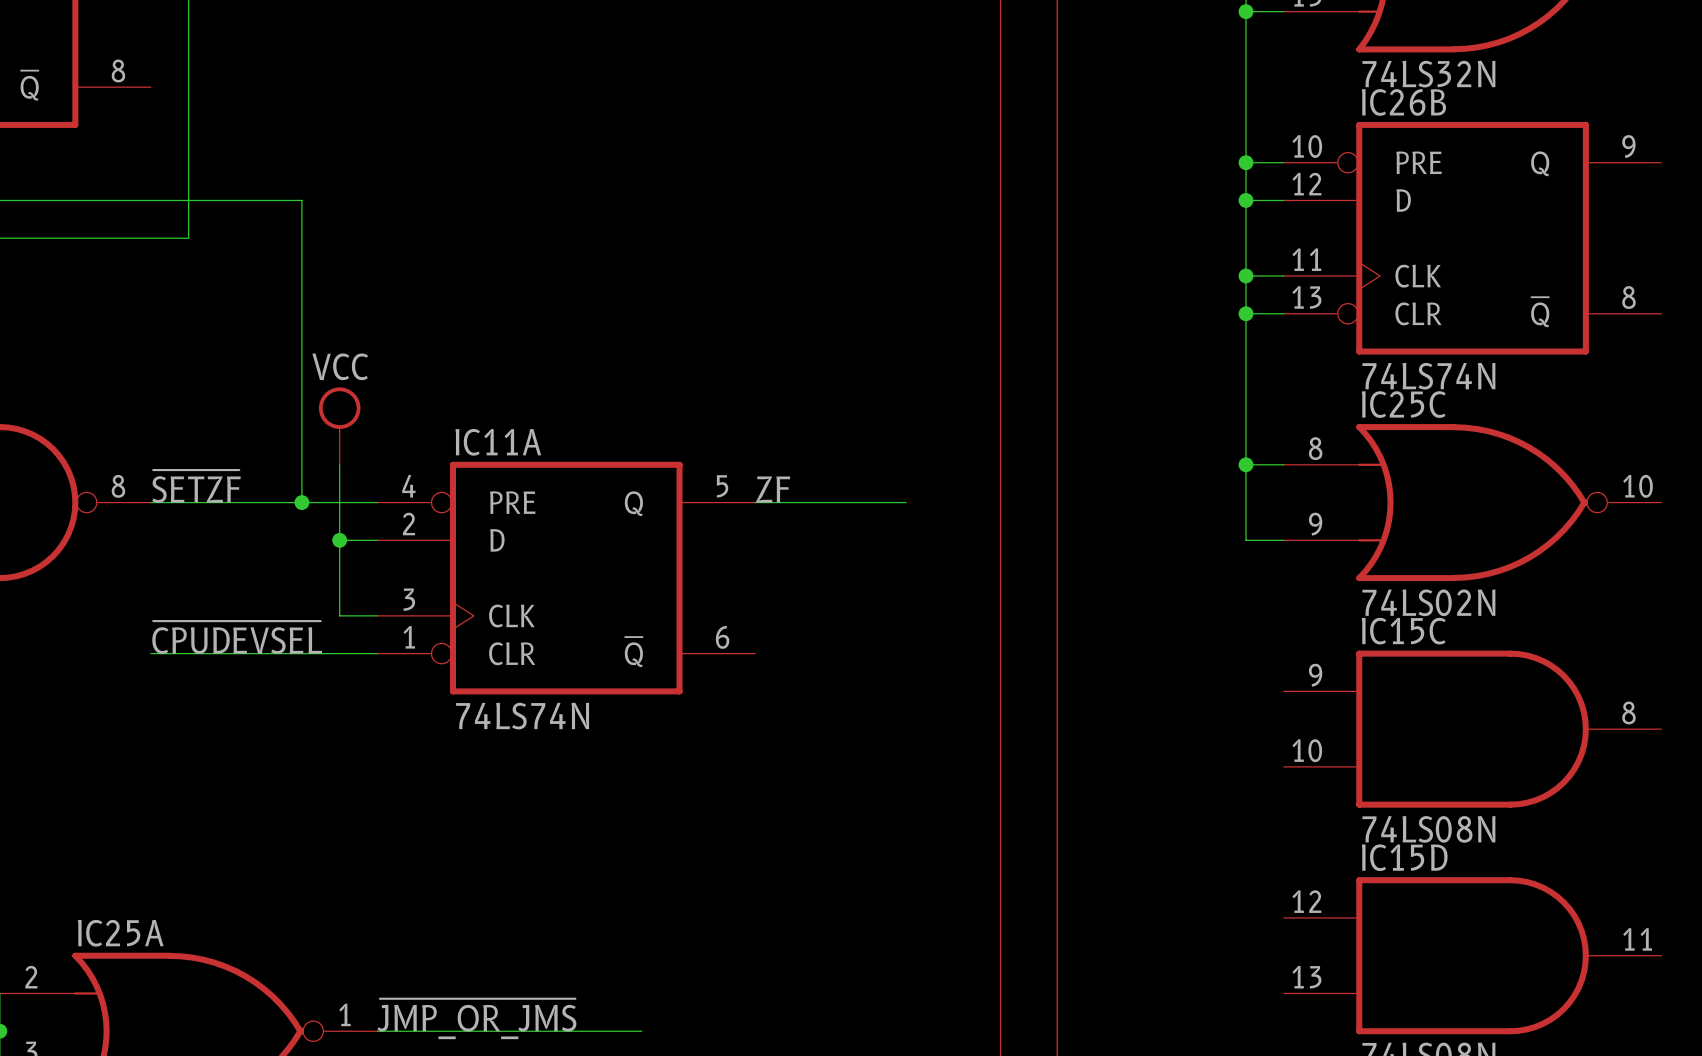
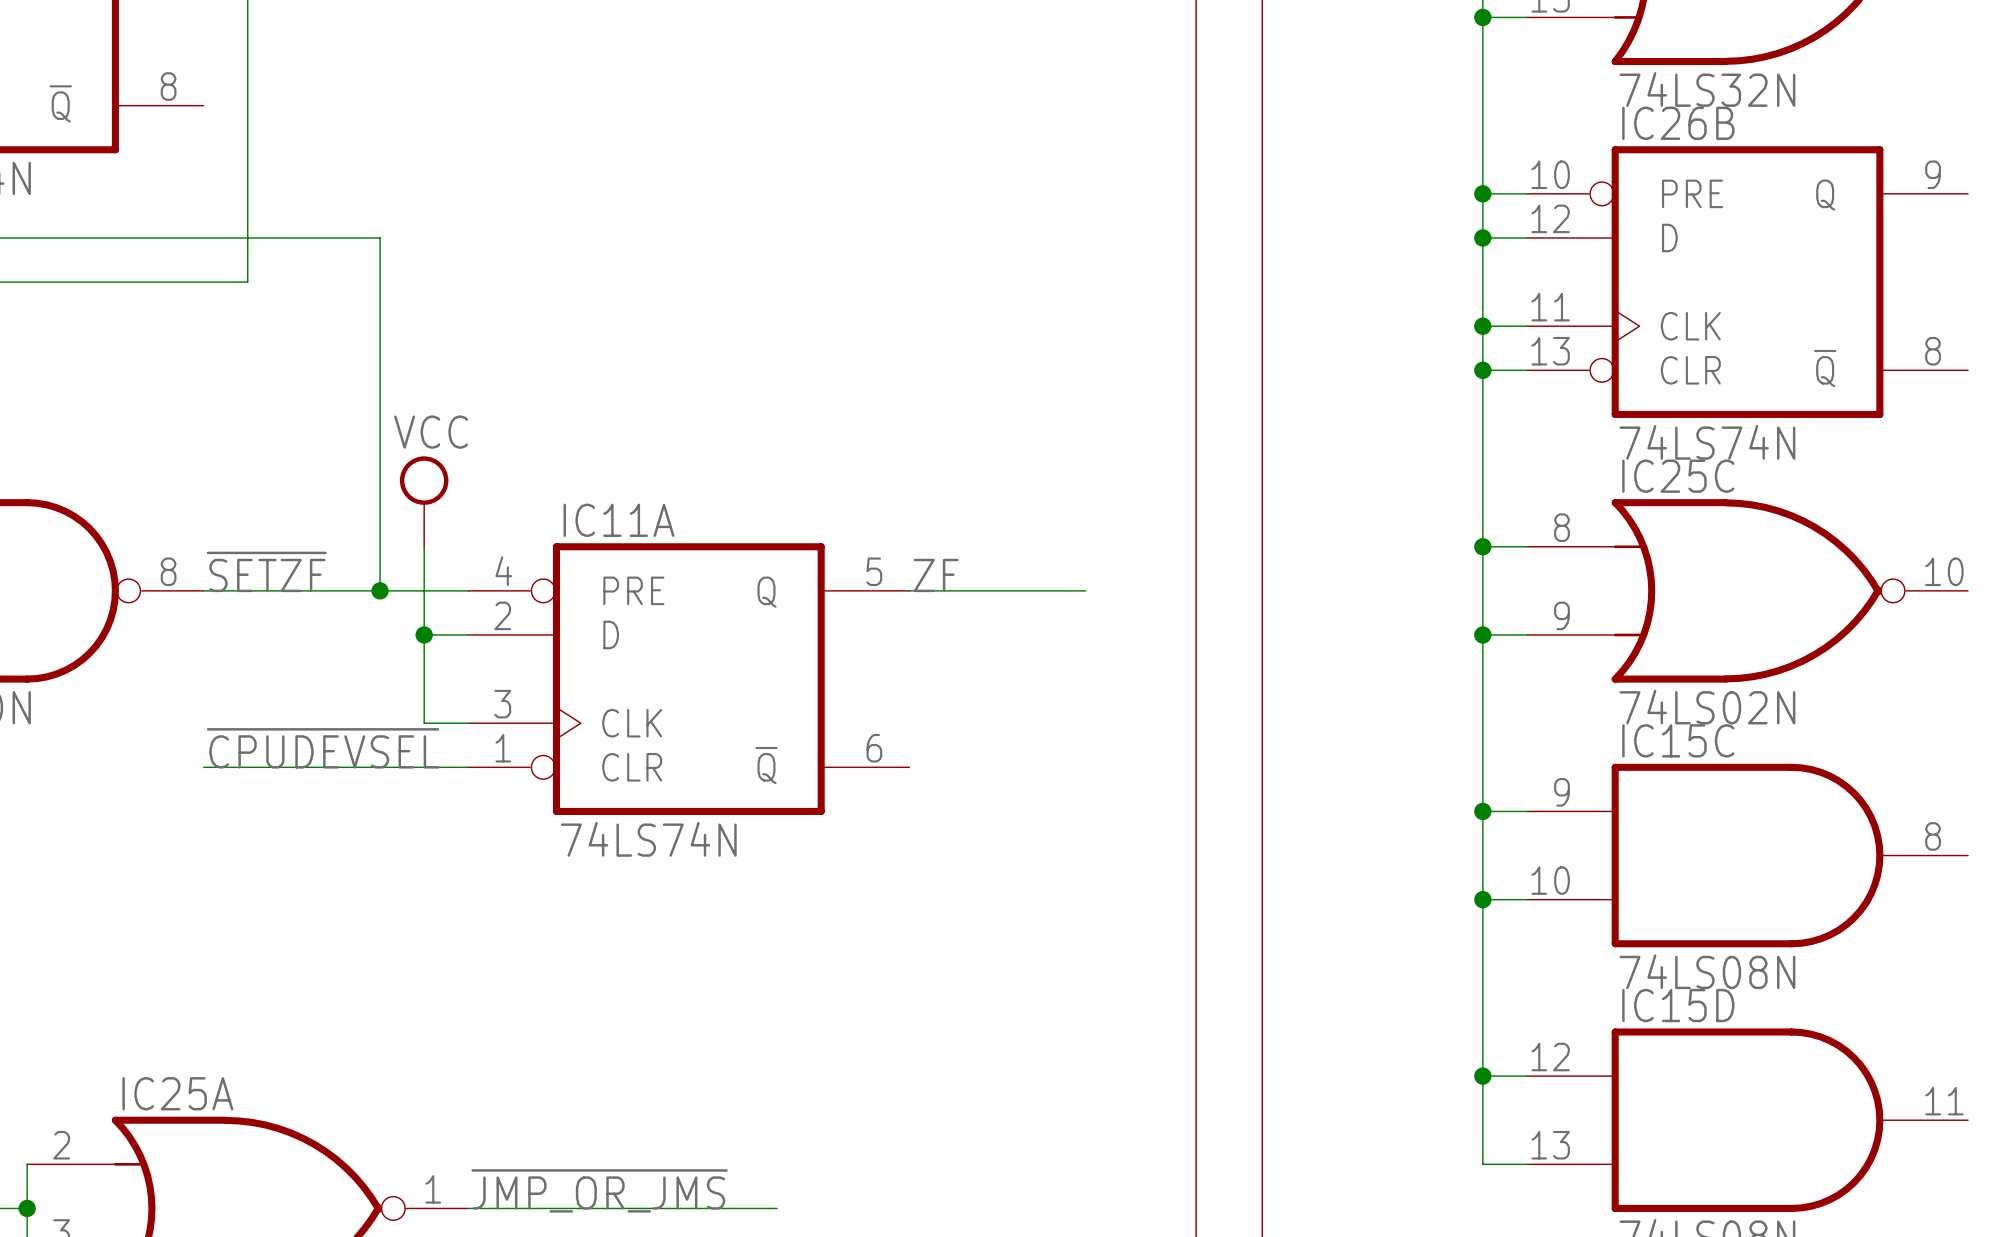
wire: none -> (1482, 634) (1482, 1164) (1526, 1164)
junction: none -> (1482, 634)
wire: none -> (1482, 811) (1526, 811)
junction: none -> (1482, 811)
wire: none -> (1482, 899) (1526, 899)
junction: none -> (1482, 899)
wire: none -> (1482, 1076) (1526, 1076)
junction: none -> (1482, 1076)

